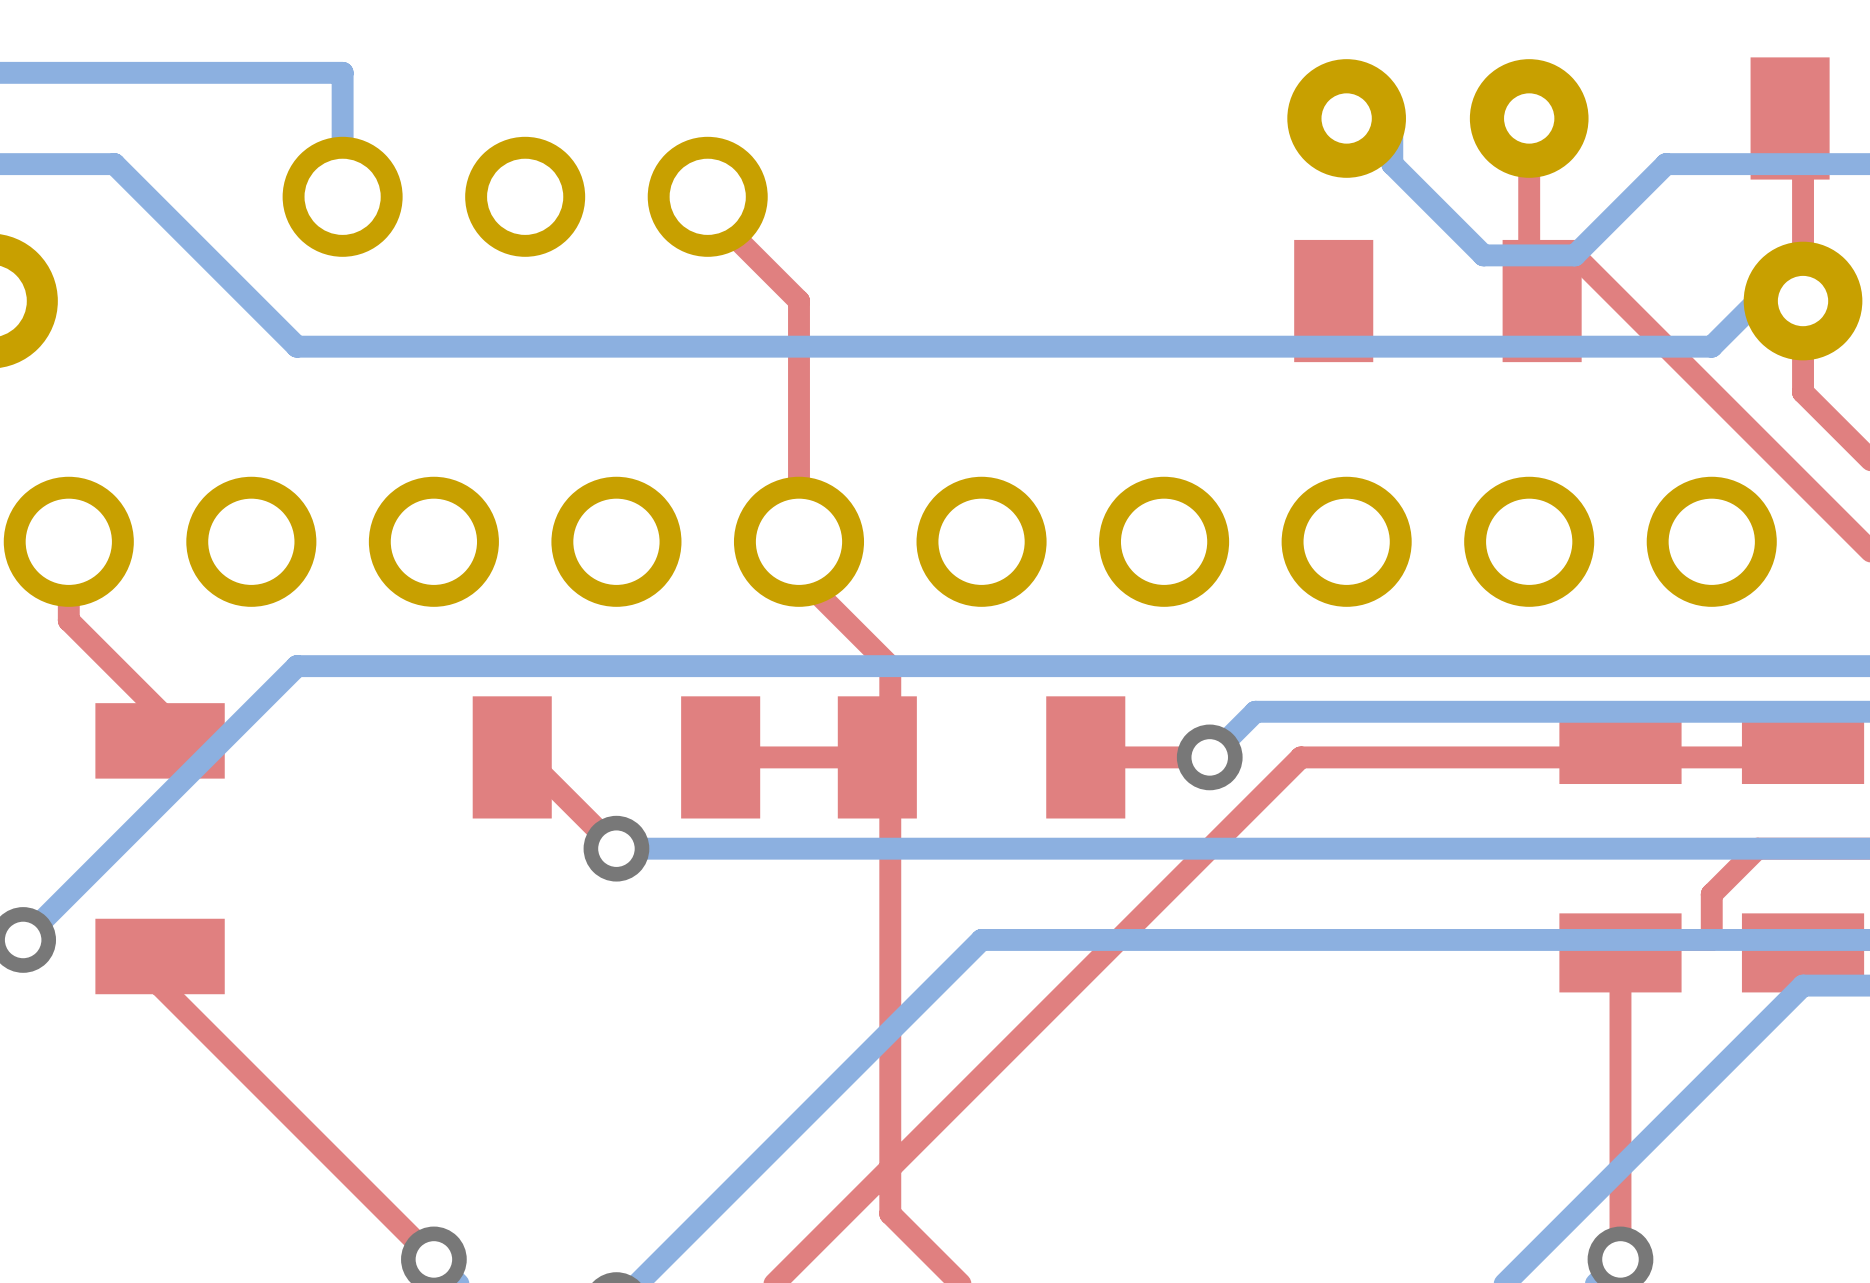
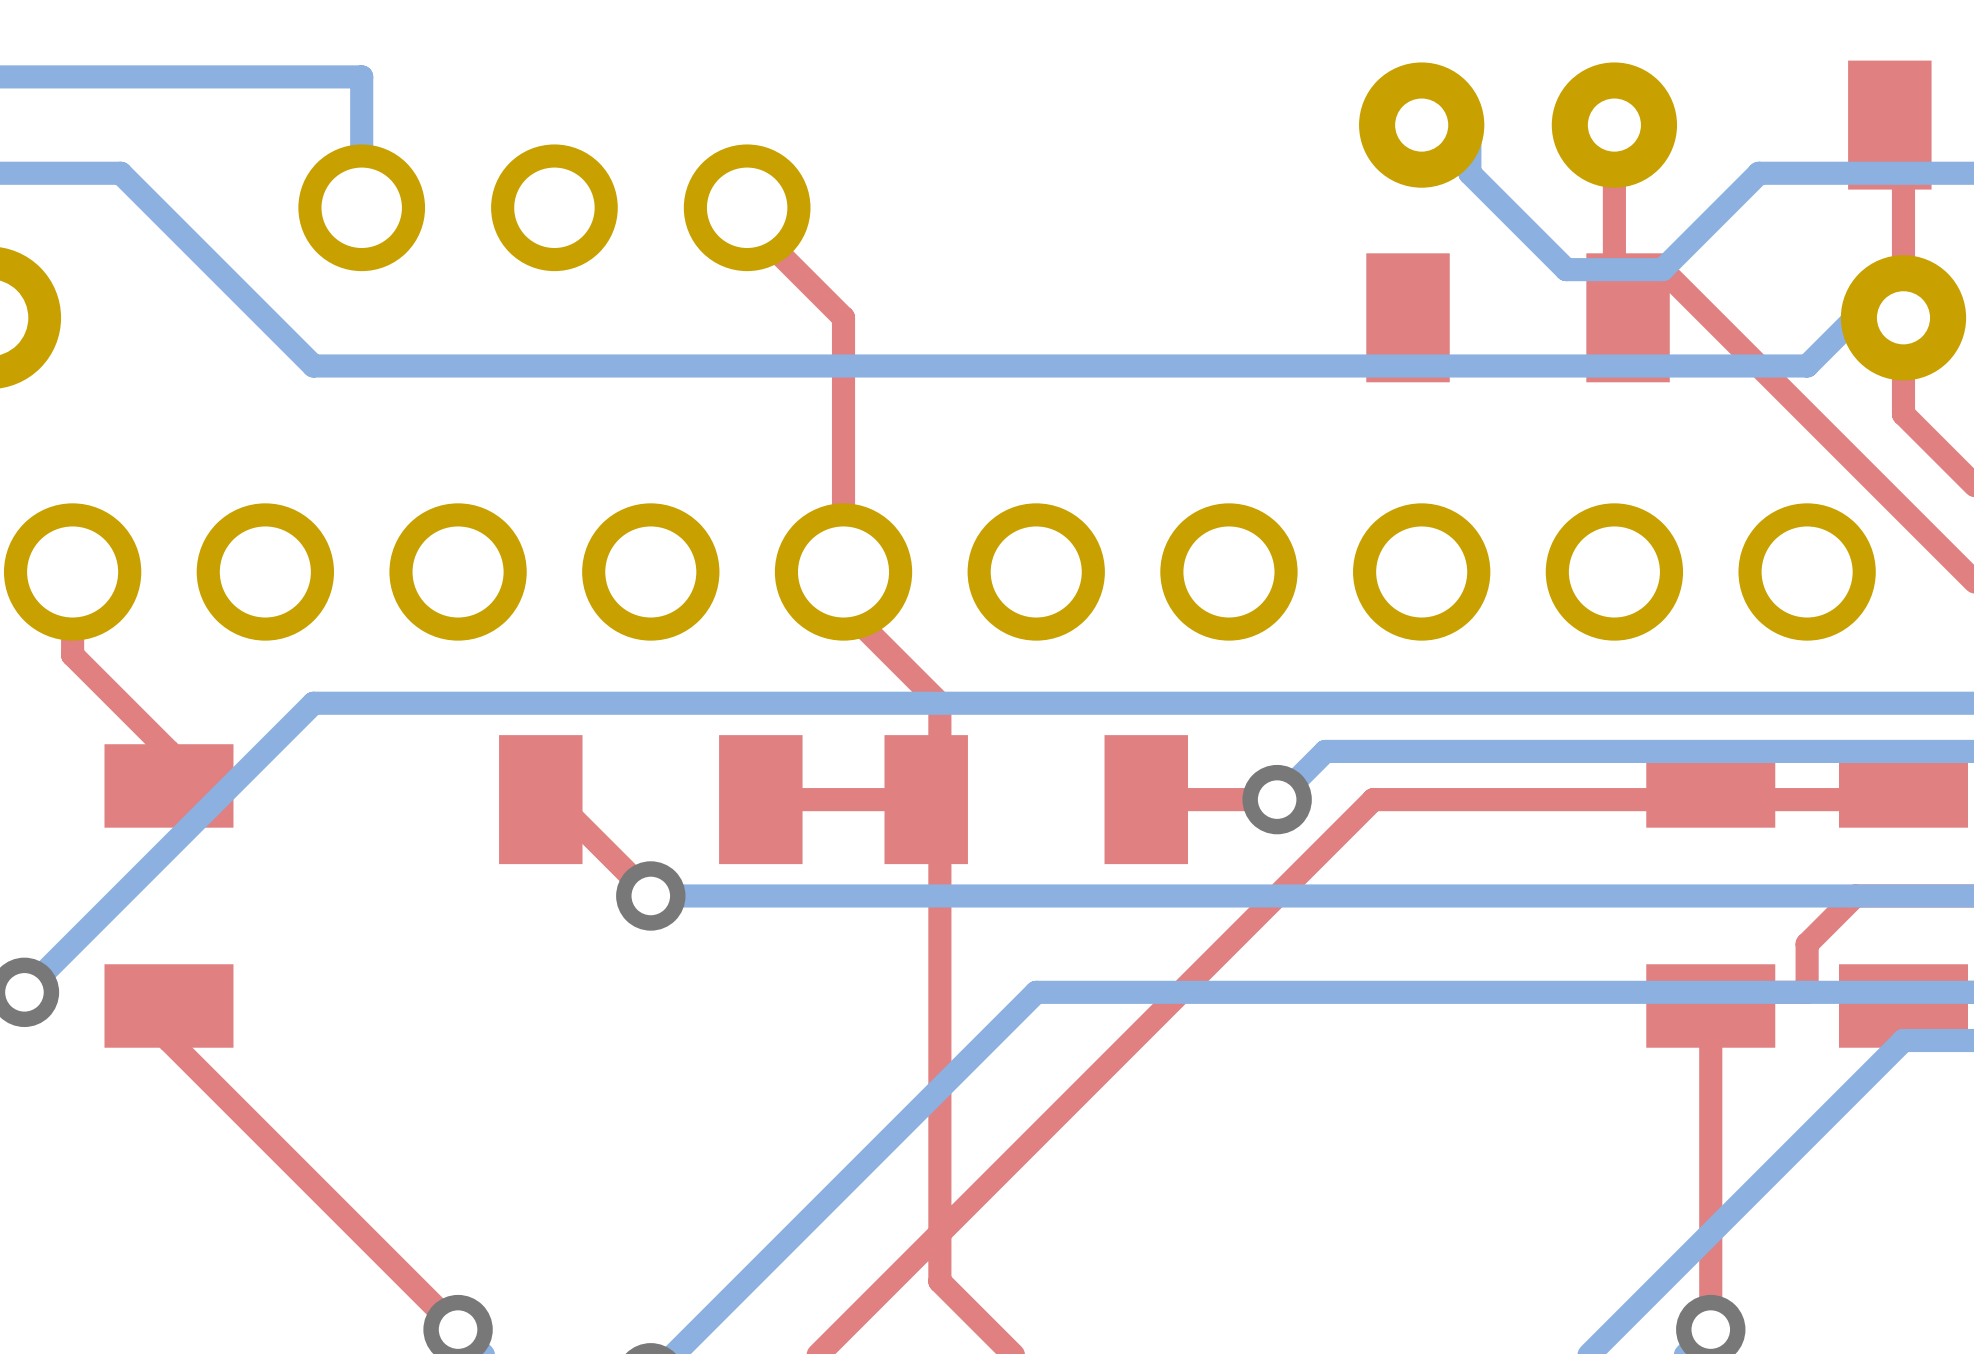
part footprint: [95, 703, 225, 995] -> [104, 744, 234, 1048]

